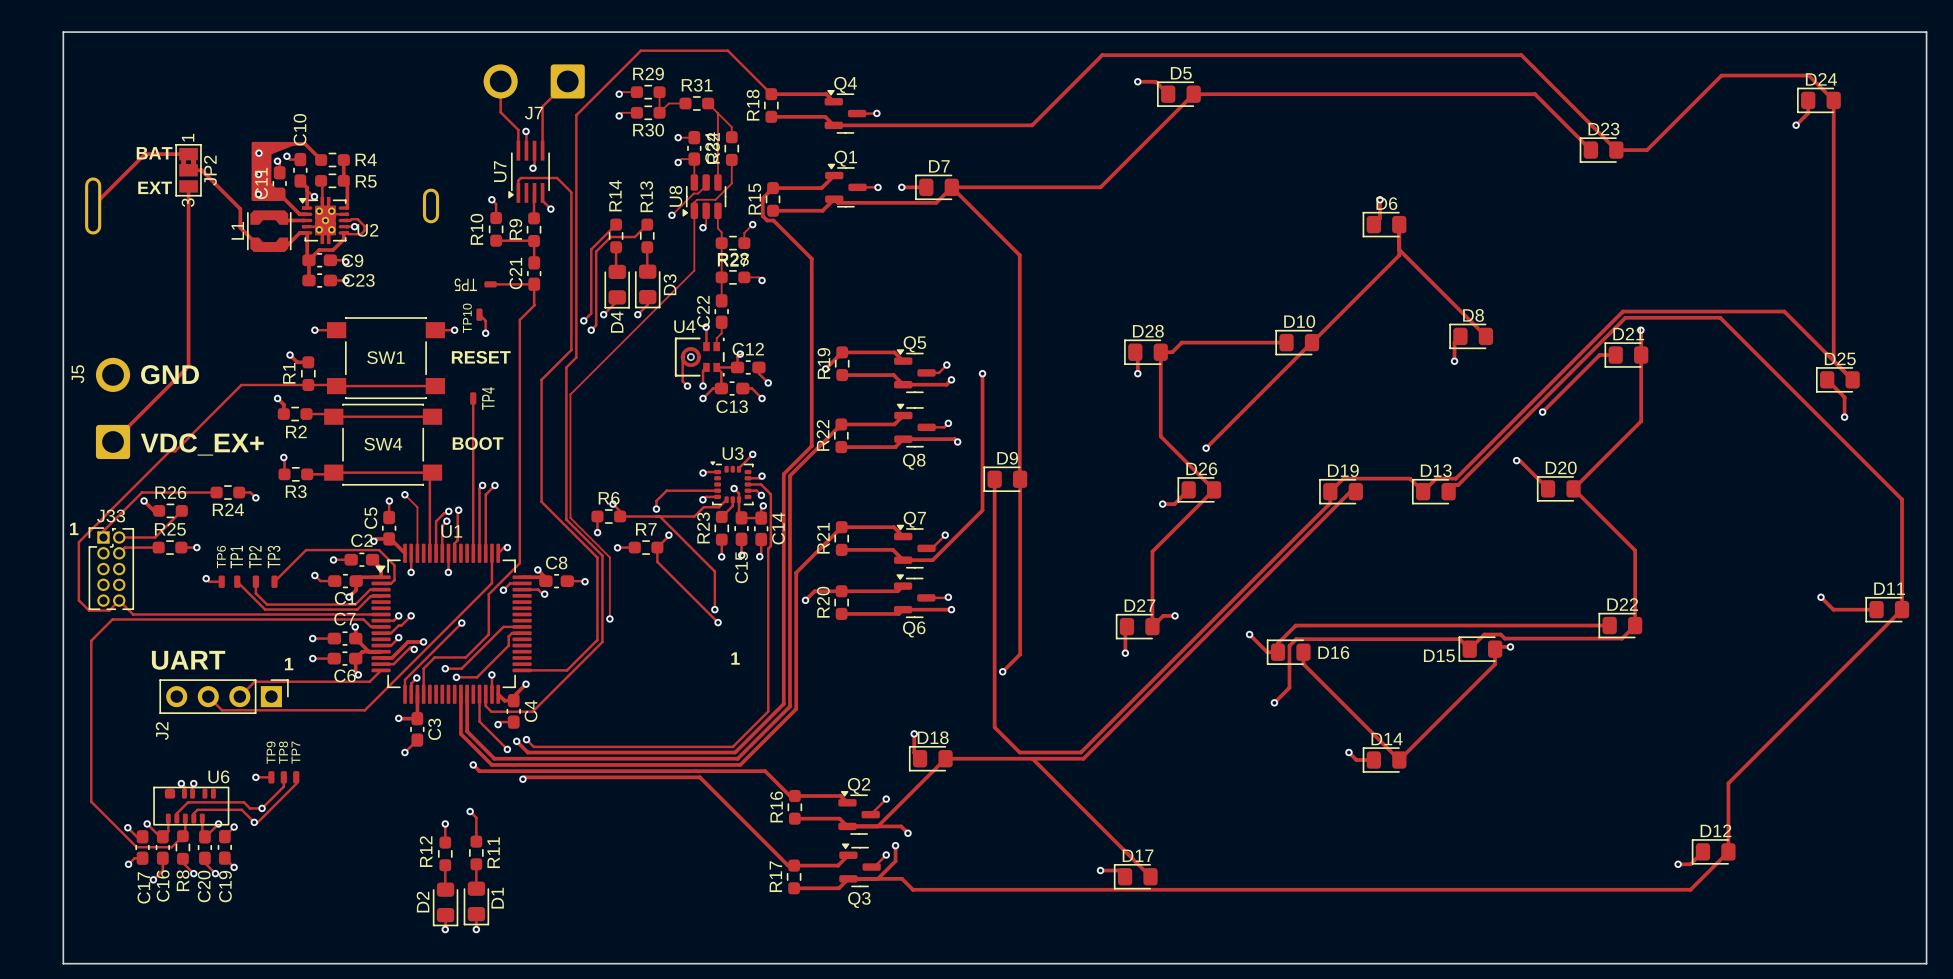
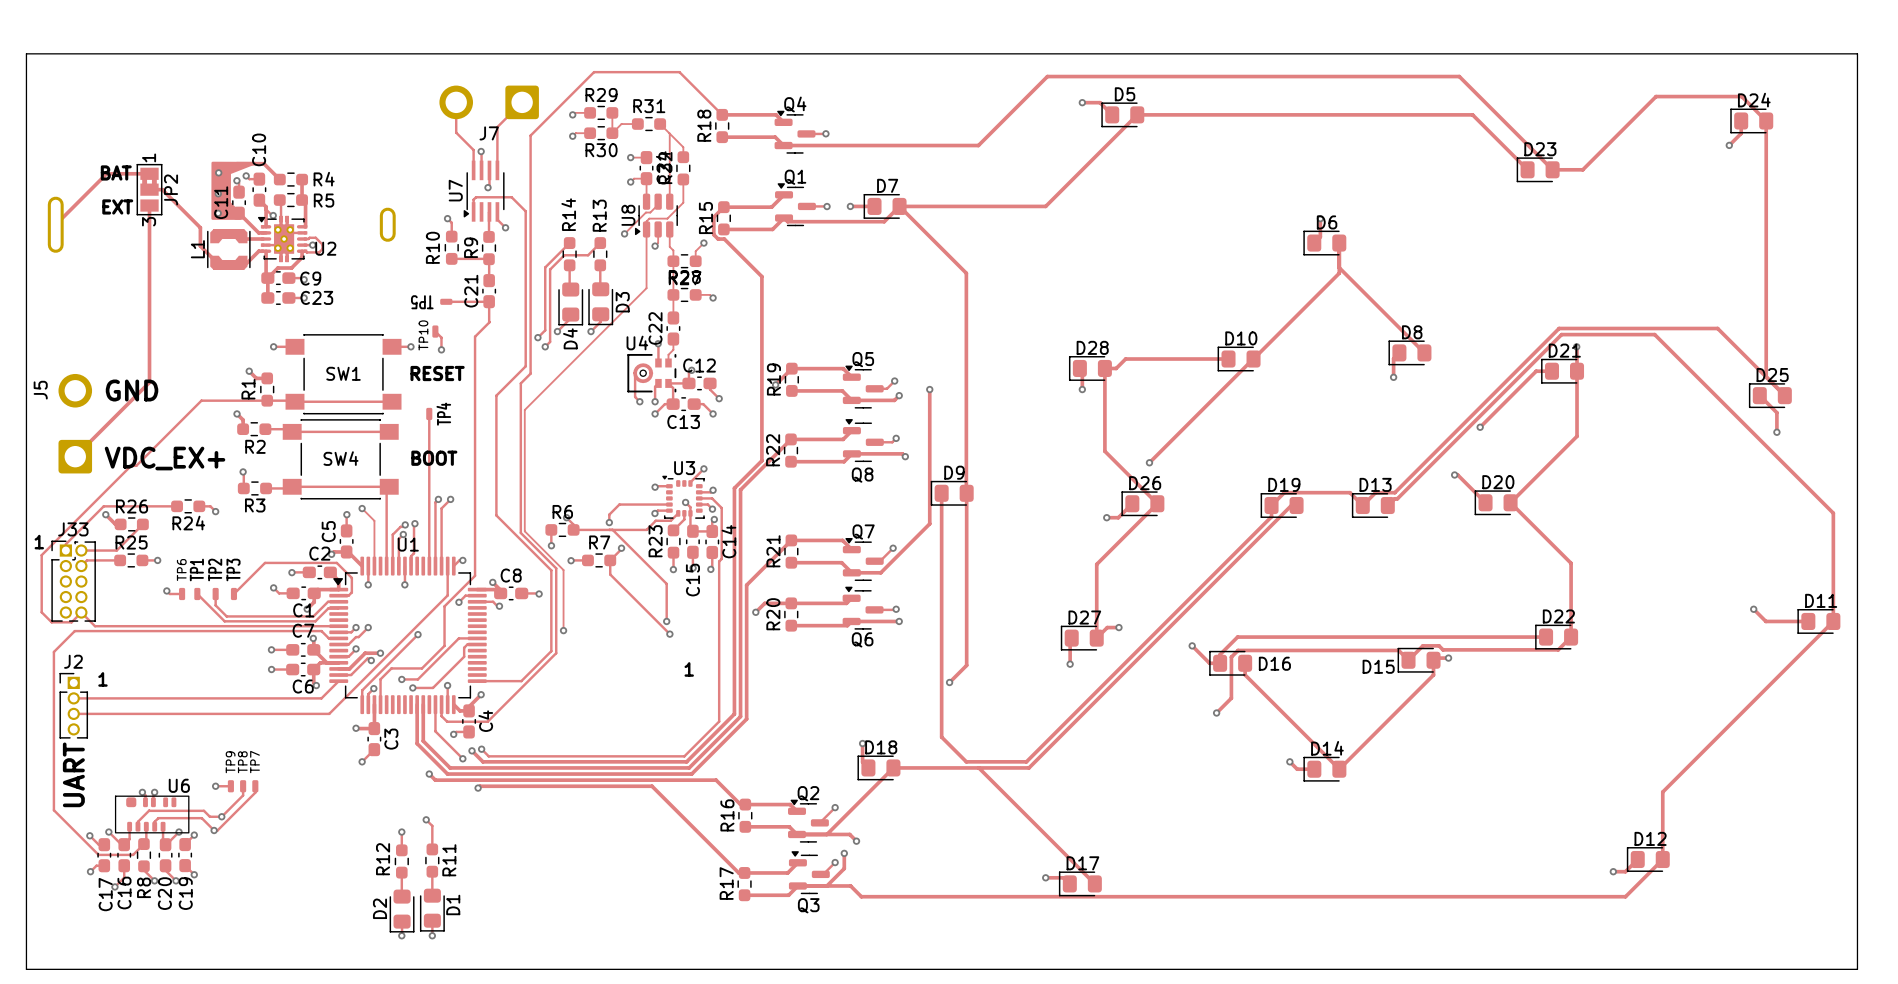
text rotation: 0° (188, 660) -> 90° counterclockwise (73, 774)
text position: UART (188, 660) -> UART (73, 774)
text position: 1 (289, 664) -> 1 (102, 679)
J2 footprint: [159, 679, 289, 714] -> [59, 672, 89, 739]
track: (369, 681) (254, 681) (239, 696) -> (327, 692) (321, 698) (73, 698)
track: (208, 696) (221, 710) (364, 710) (371, 703) -> (73, 713) (329, 713)
J2 name position: J2 (162, 731) -> J2 (73, 661)

